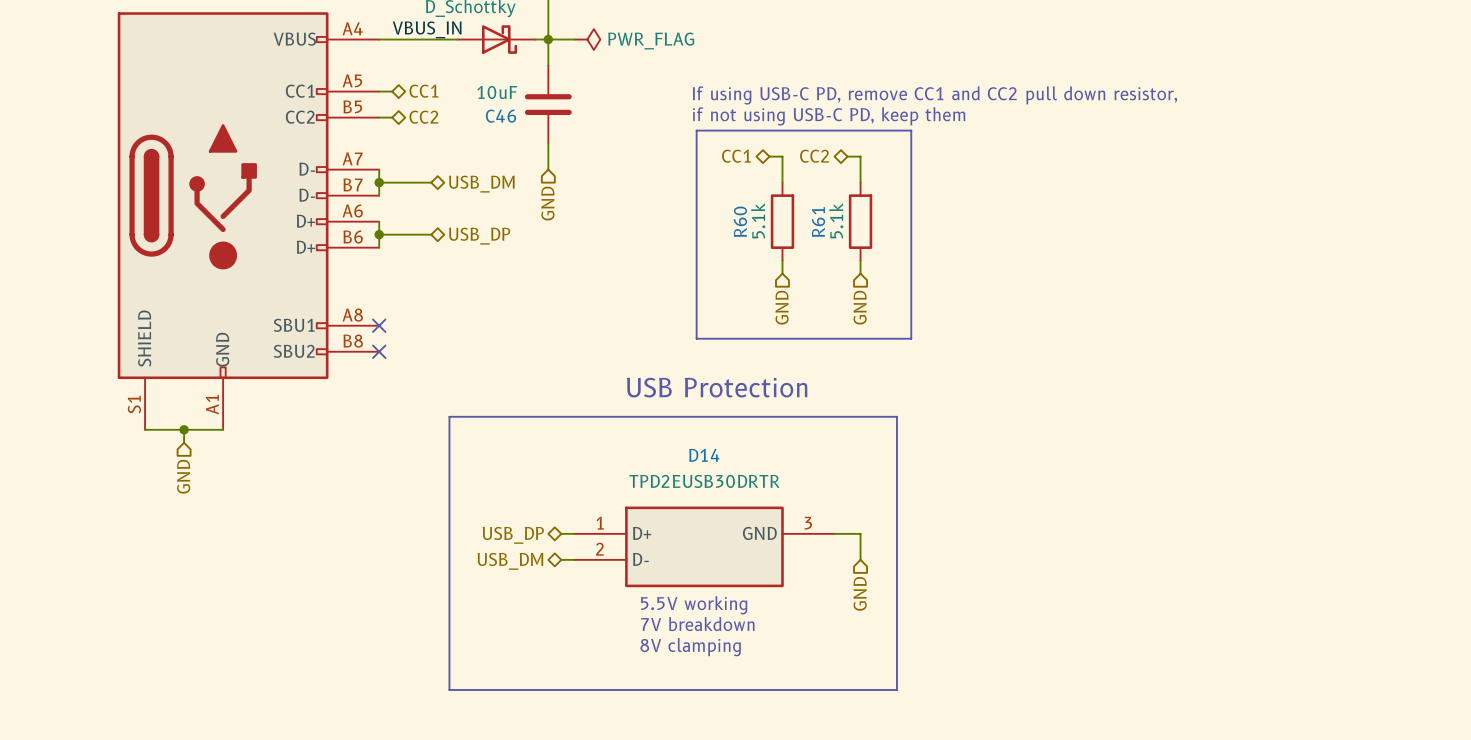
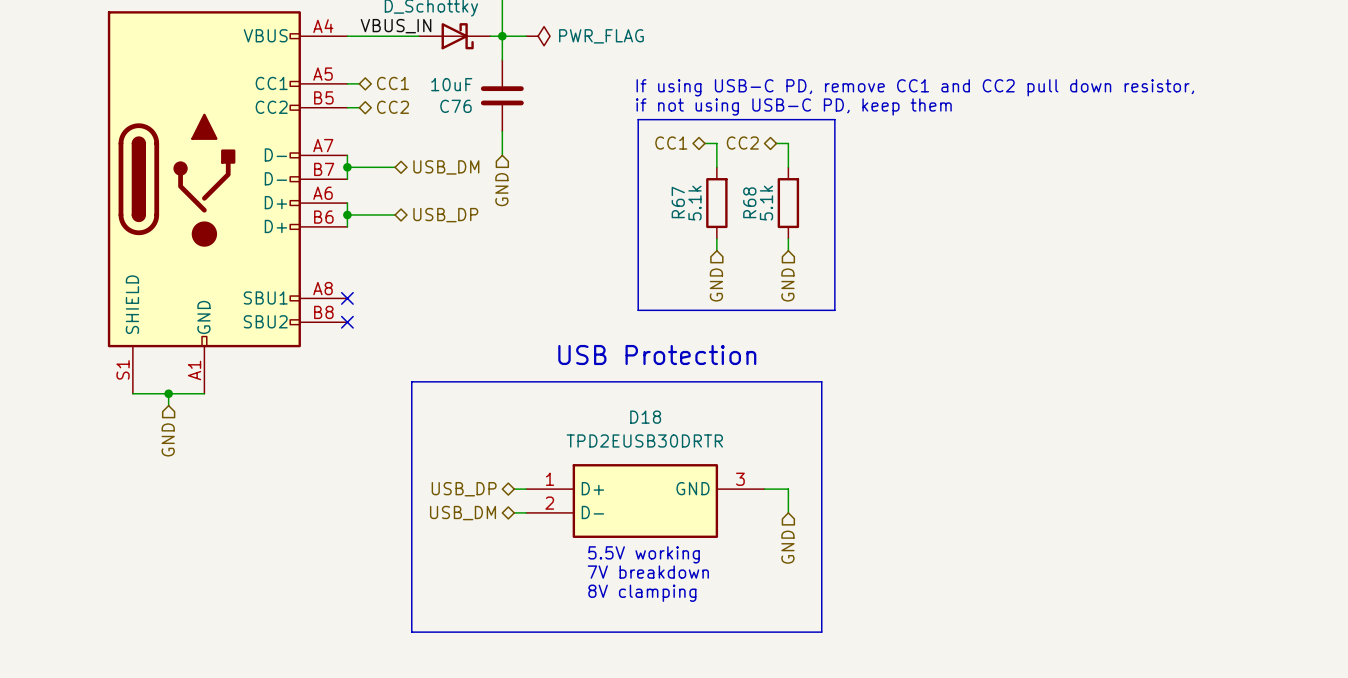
C46 name: C46 (501, 116) -> C76 (455, 106)
R60 name: R60 (740, 221) -> R67 (678, 202)
R61 name: R61 (818, 222) -> R68 (749, 202)
D14 name: D14 (704, 455) -> D18 (645, 417)

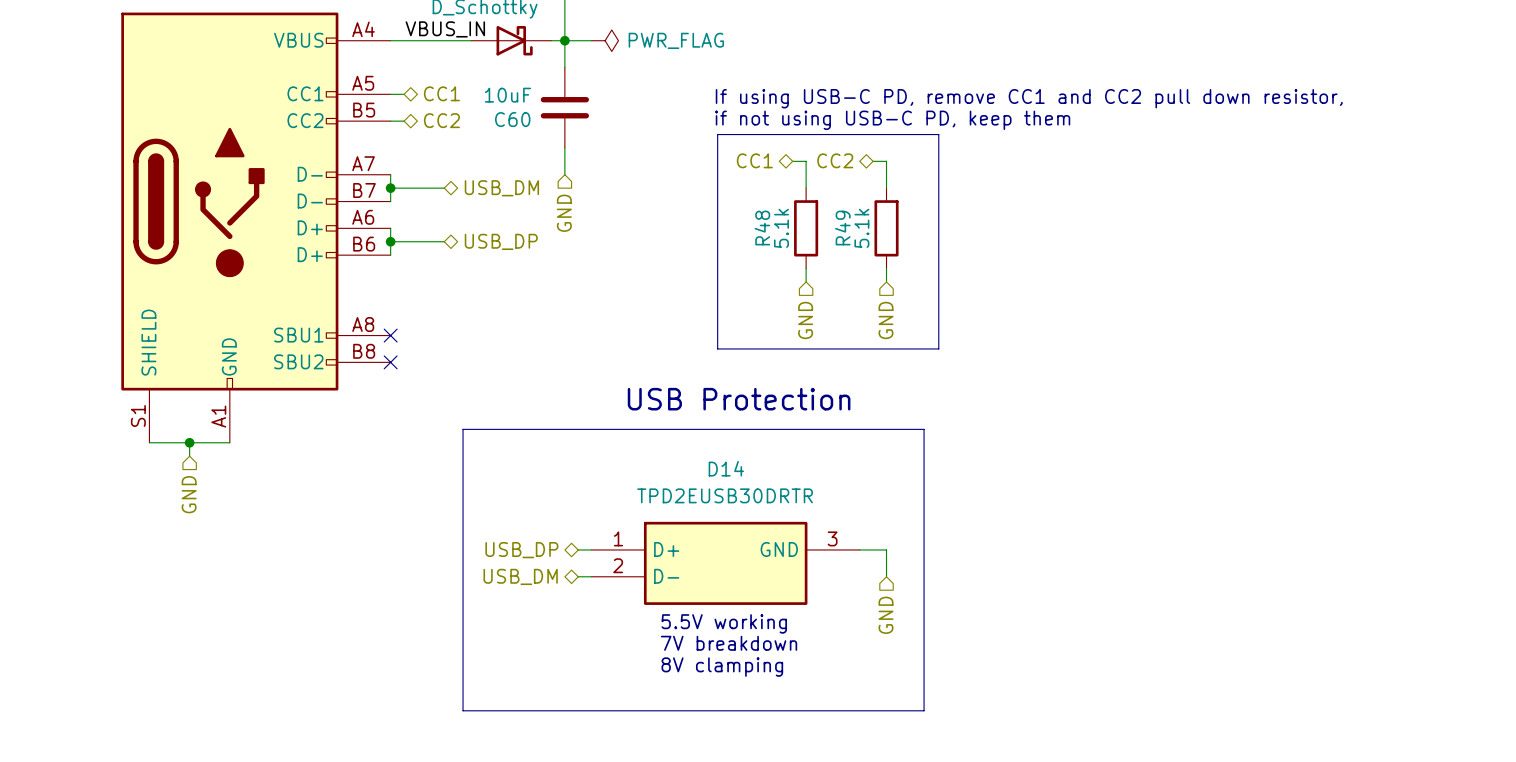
C76 name: C76 (455, 106) -> C60 (512, 119)
R67 name: R67 (678, 202) -> R48 (762, 228)
R68 name: R68 (749, 202) -> R49 (842, 228)
D18 name: D18 (645, 417) -> D14 (726, 468)

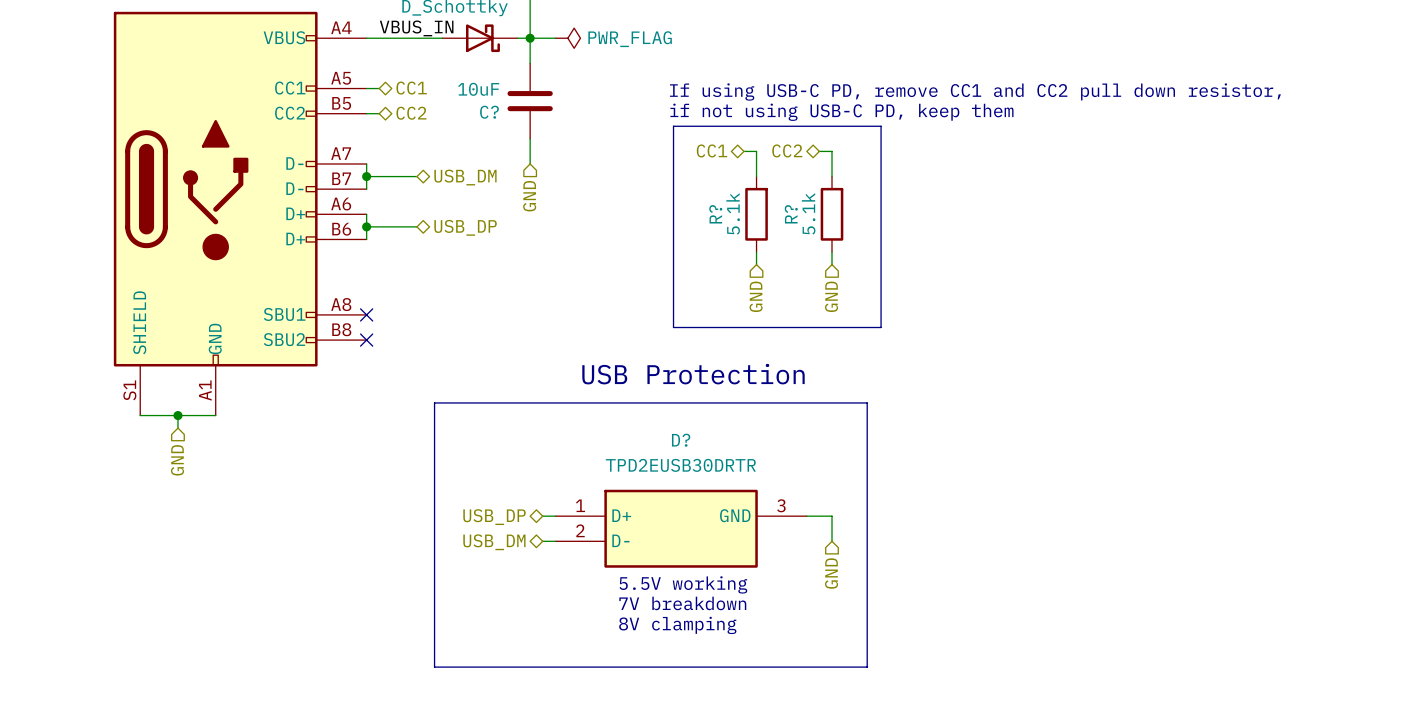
C60 name: C60 (512, 119) -> C? (489, 112)
R48 name: R48 (762, 228) -> R? (715, 214)
R49 name: R49 (842, 228) -> R? (791, 214)
D14 name: D14 (726, 468) -> D? (681, 440)

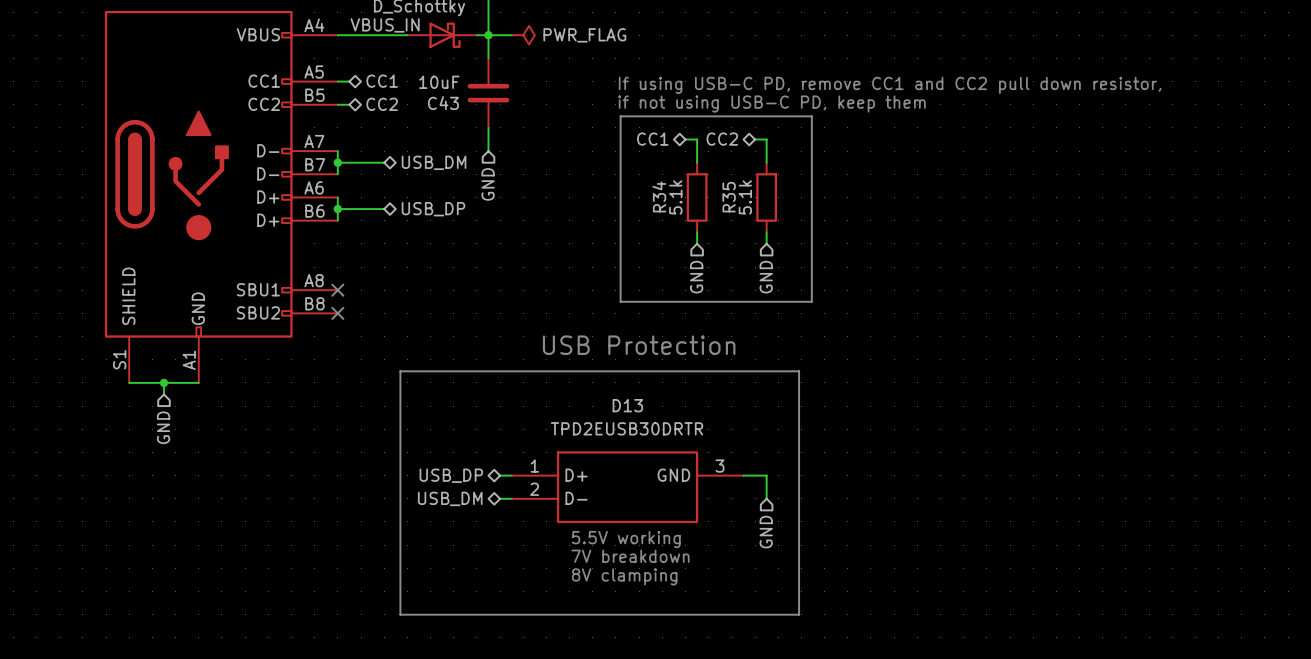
C? name: C? (489, 112) -> C43 (443, 103)
R? name: R? (715, 214) -> R34 (659, 196)
R? name: R? (791, 214) -> R35 (729, 197)
D? name: D? (681, 440) -> D13 (627, 405)

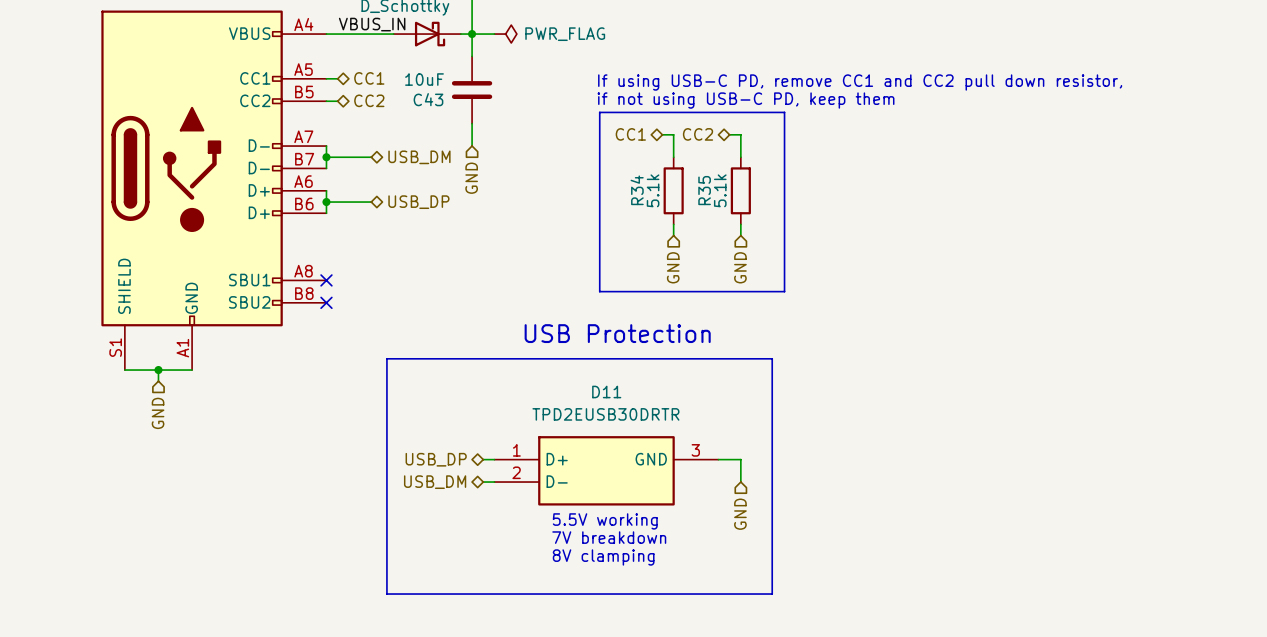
D13 name: D13 (627, 405) -> D11 (606, 392)

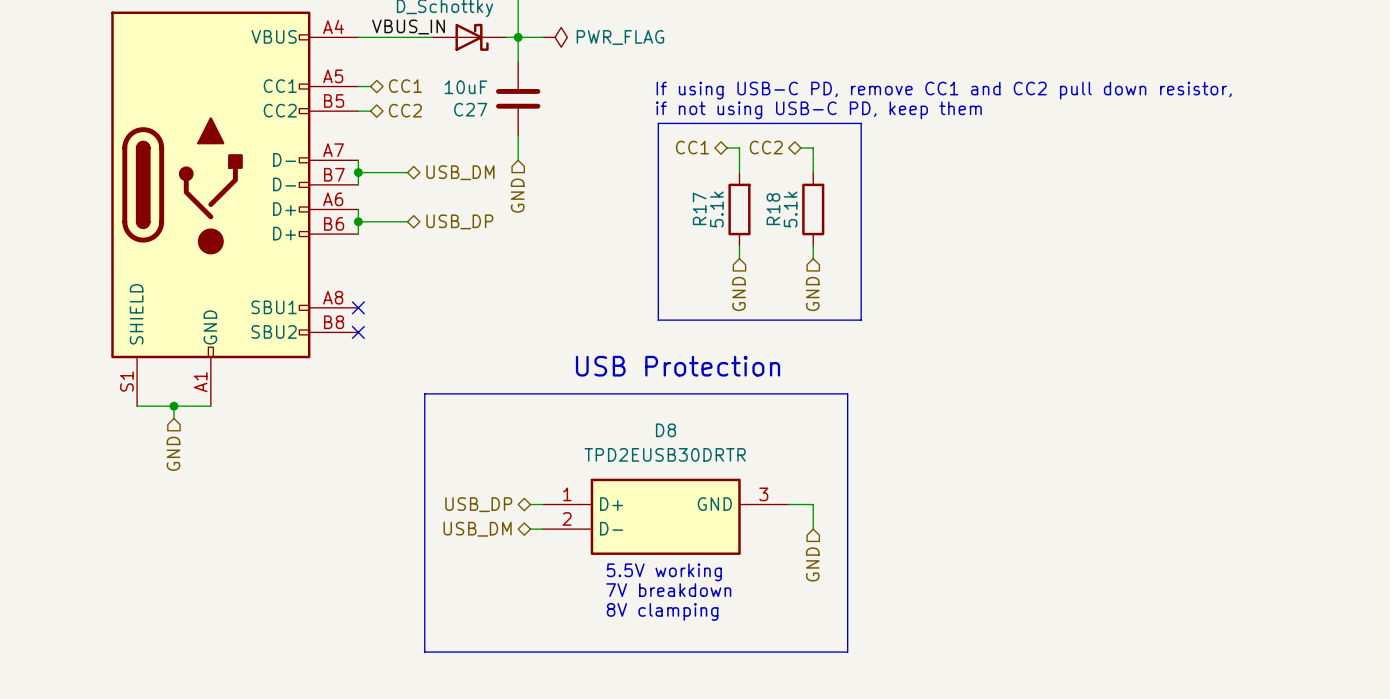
C43 name: C43 (428, 99) -> C27 (470, 109)
R34 name: R34 (637, 190) -> R17 (699, 208)
R35 name: R35 (704, 190) -> R18 (773, 209)
D11 name: D11 (606, 392) -> D8 (666, 430)

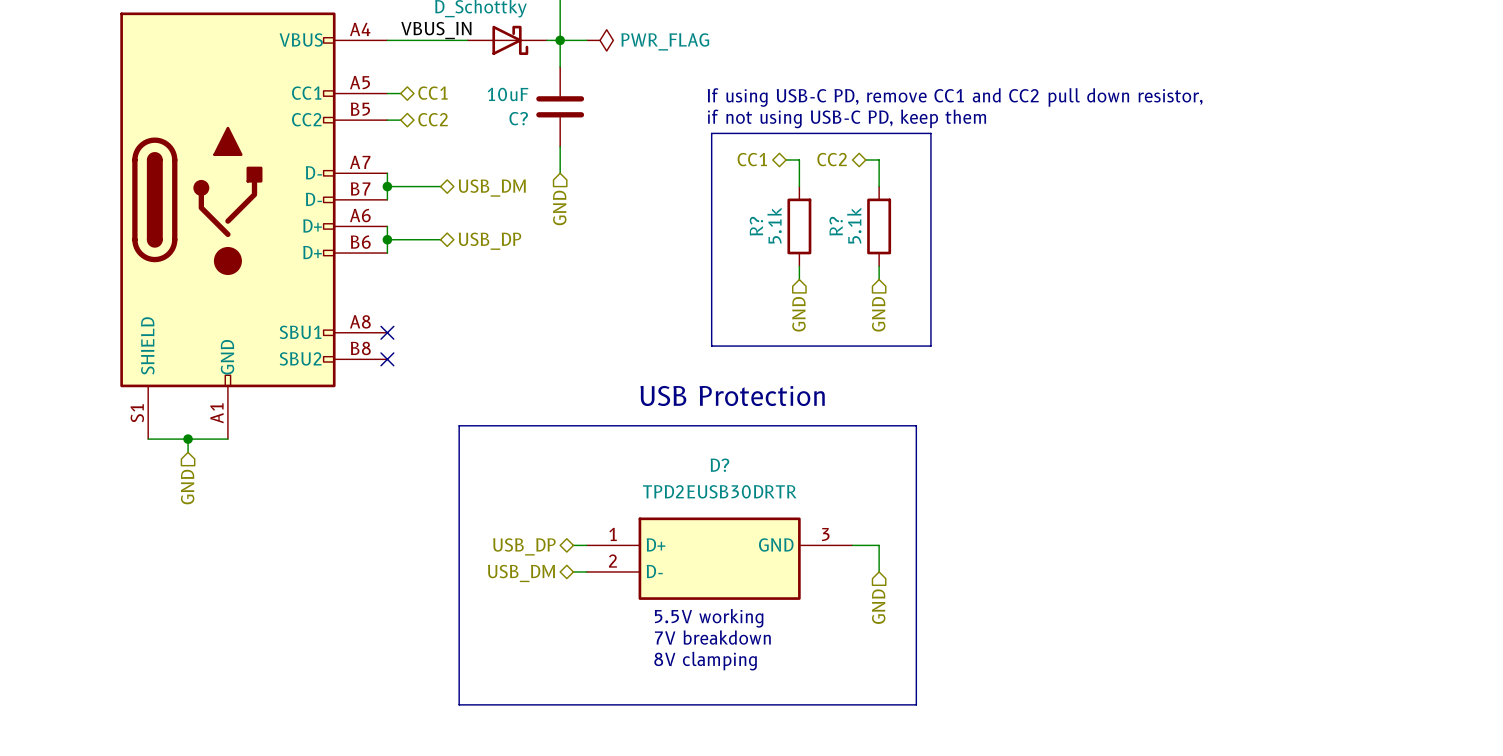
C27 name: C27 (470, 109) -> C? (518, 118)
R17 name: R17 (699, 208) -> R? (756, 226)
R18 name: R18 (773, 209) -> R? (836, 226)
D8 name: D8 (666, 430) -> D? (719, 465)

